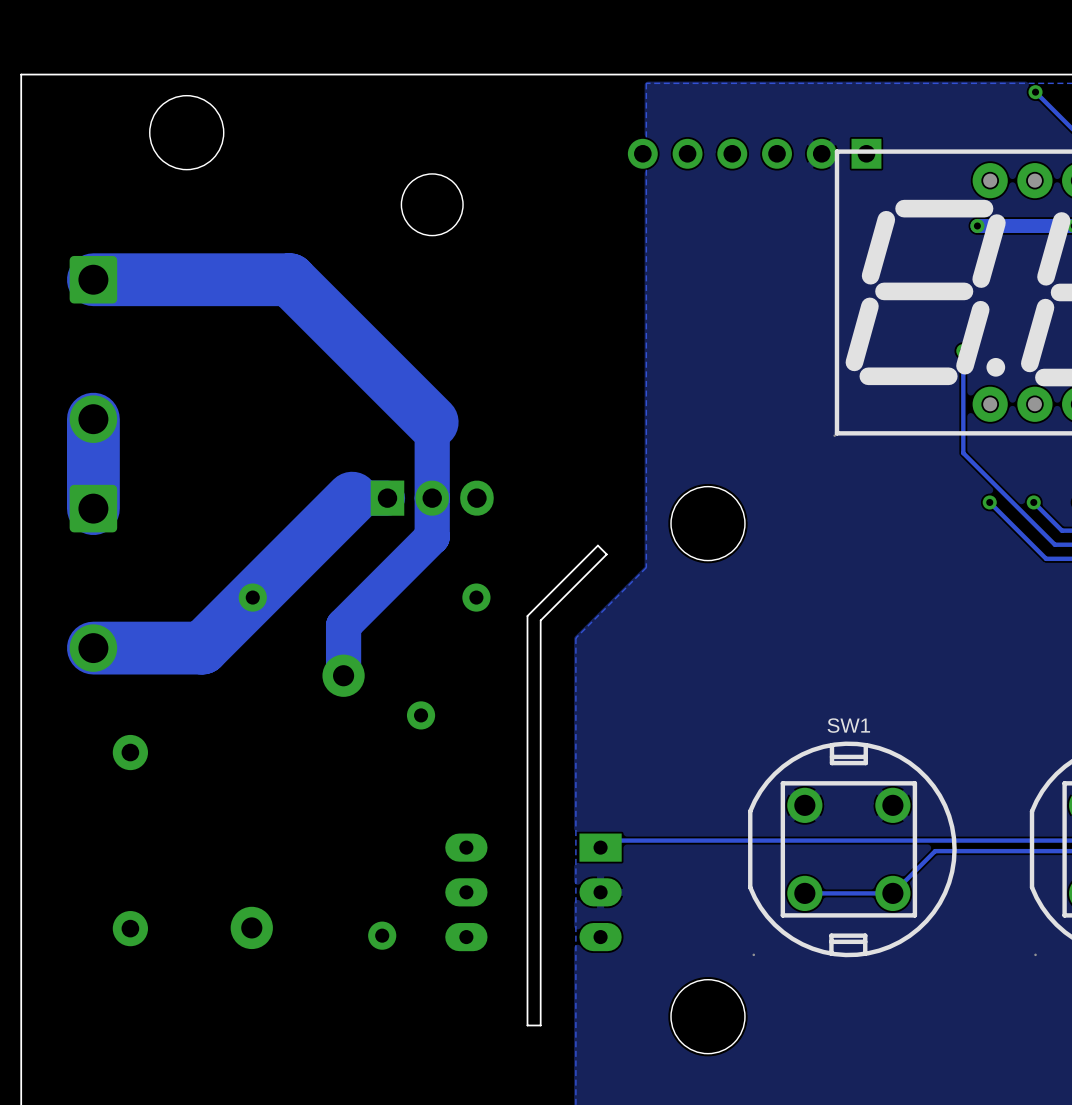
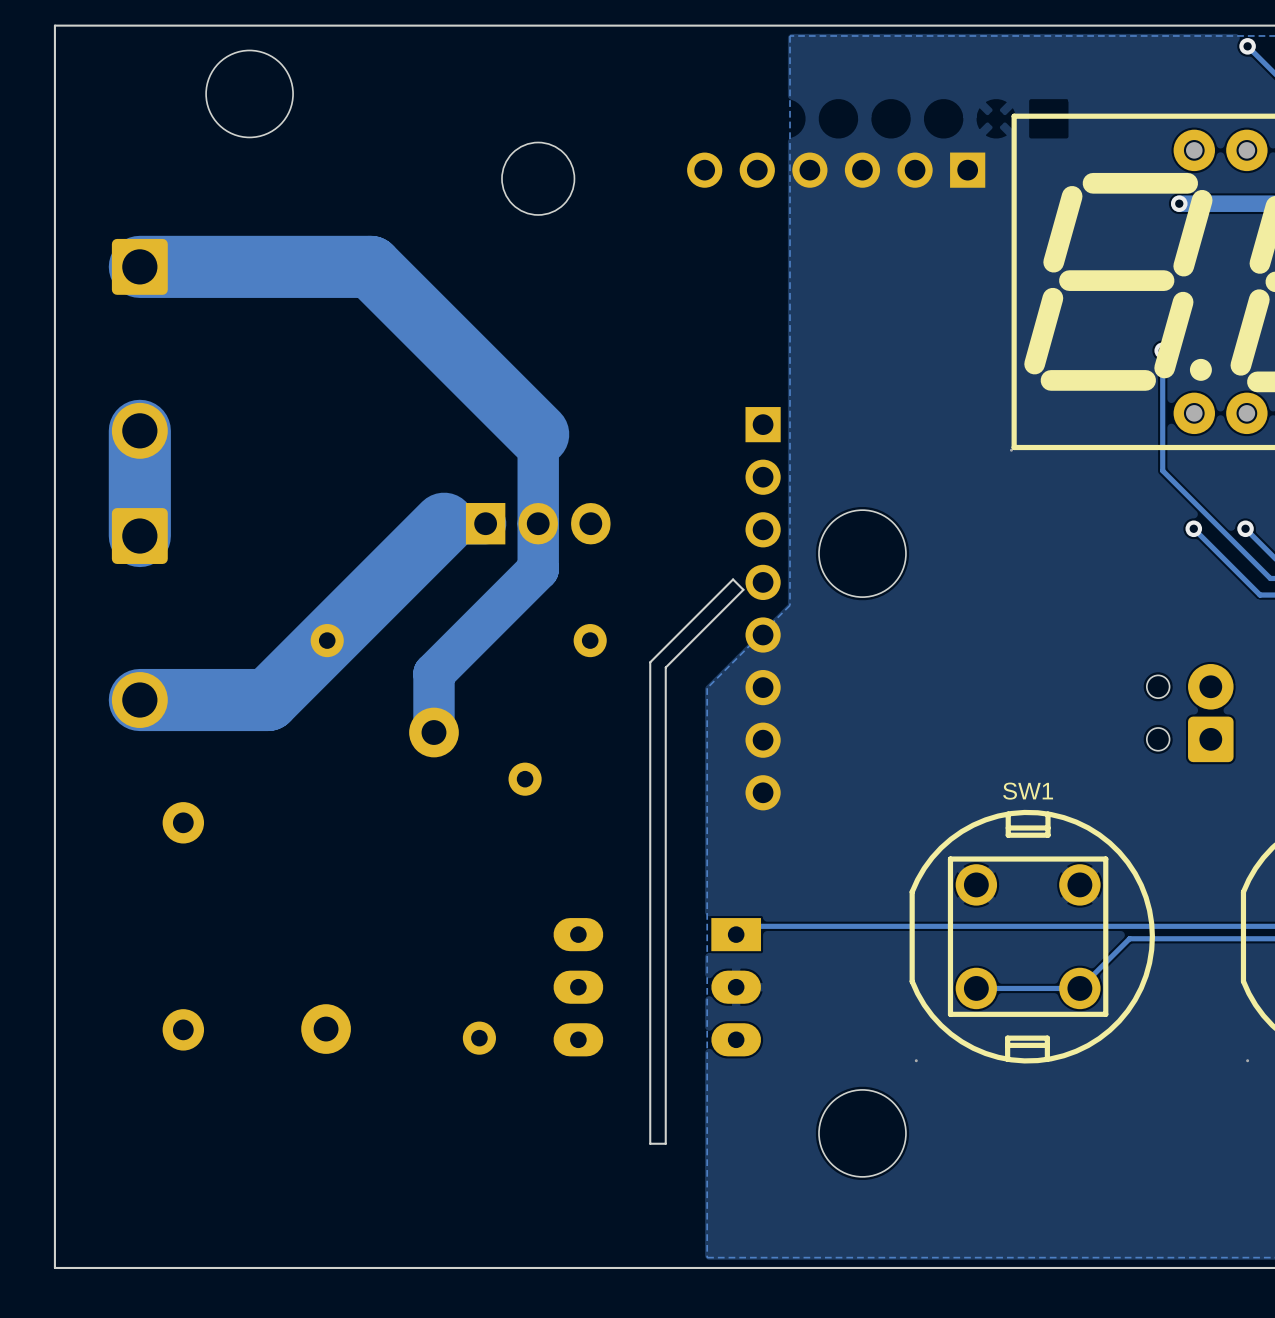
part position: (754, 153) -> (836, 170)
part: none -> (763, 608)
part: none -> (1190, 713)

